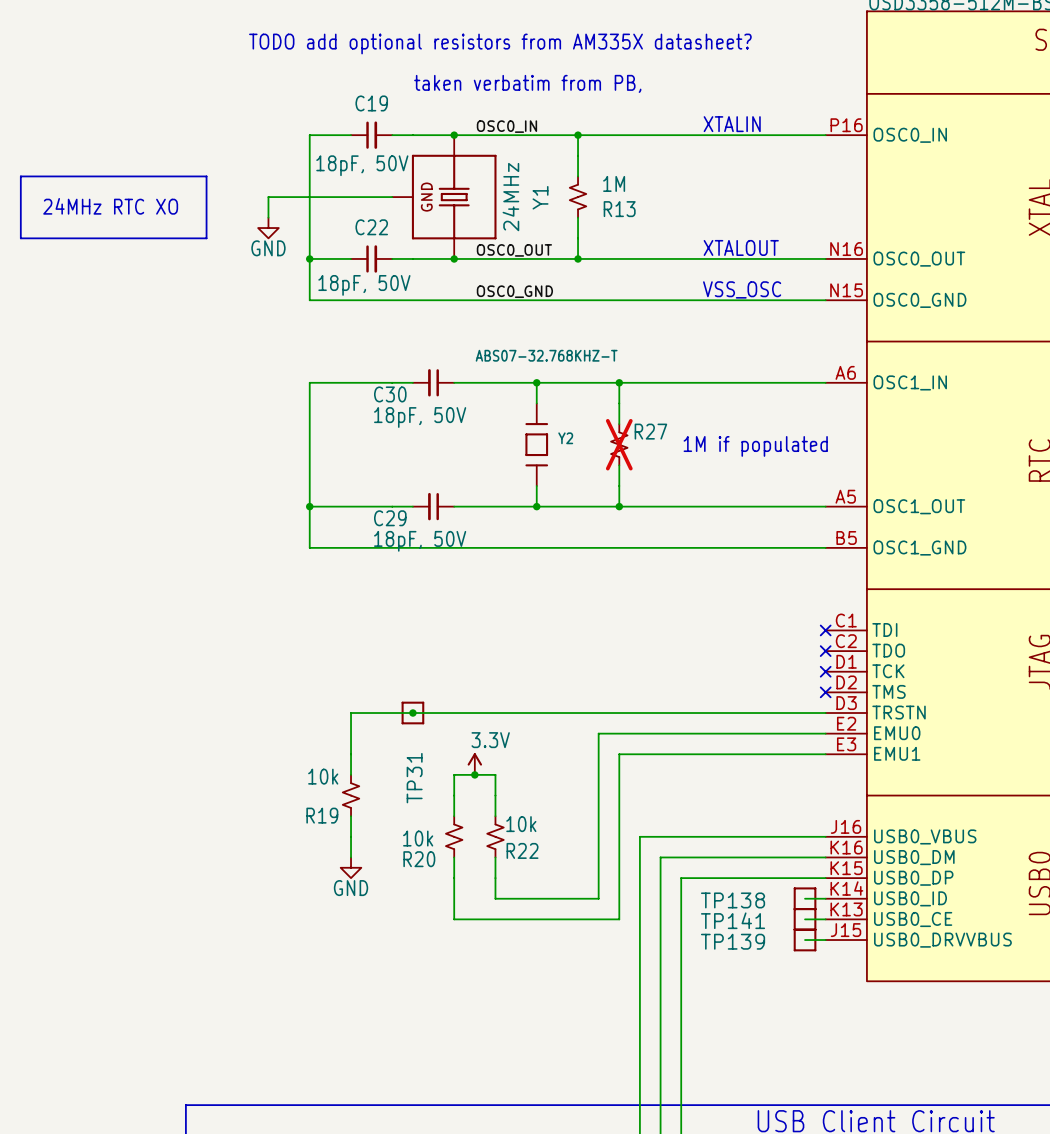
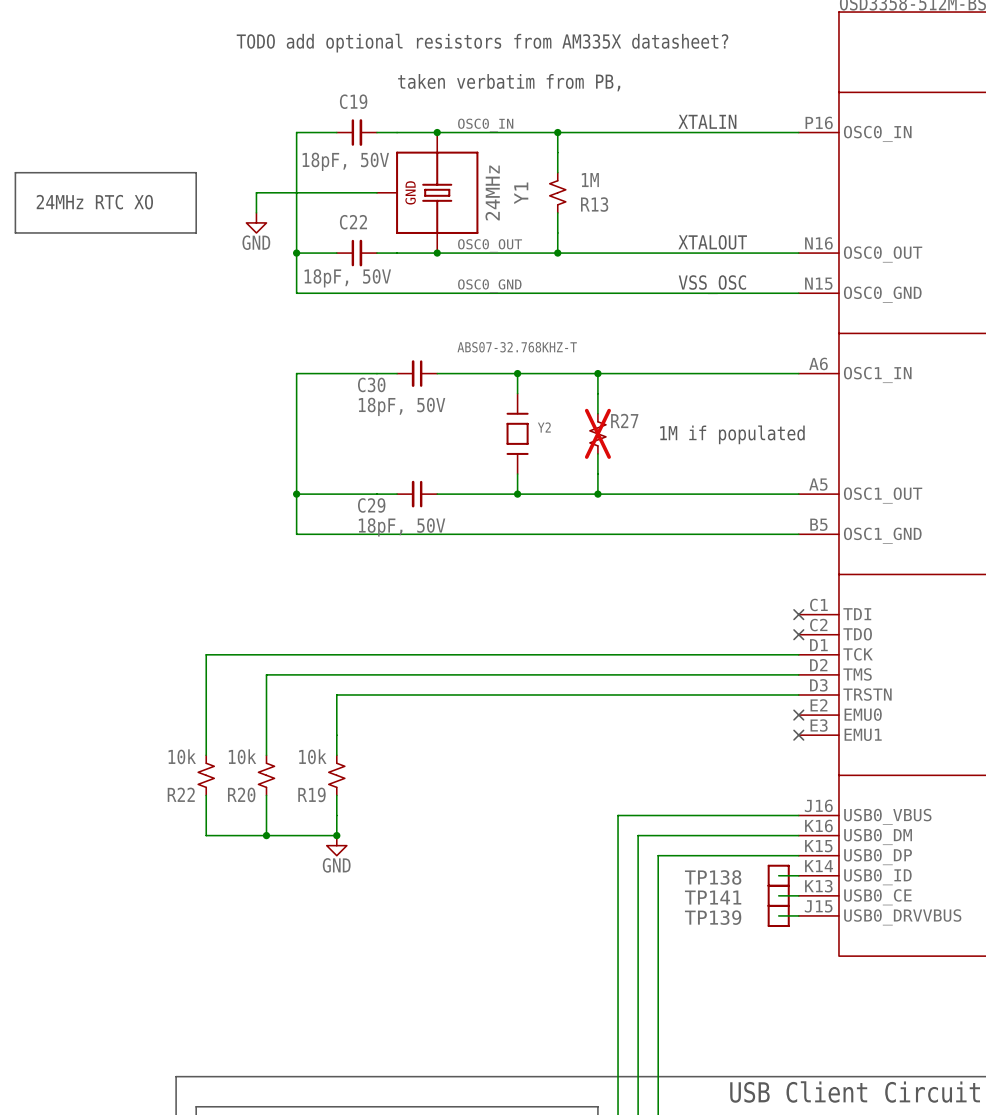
wire: none -> (798, 654) (206, 654) (206, 755)
no-connect mark: (825, 671) -> none
wire: none -> (798, 674) (266, 674) (266, 755)
no-connect mark: (825, 692) -> none
junction: (412, 713) -> none
TP31: (412, 713) -> none
wire: (825, 733) (598, 733) (598, 898) (495, 898) (495, 857) -> none
no-connect mark: none -> (798, 715)
wire: (825, 754) (619, 754) (619, 919) (454, 919) (454, 857) -> none
no-connect mark: none -> (798, 735)
power symbol: 3.3V (474, 764) -> none
junction: (474, 774) -> none
wire: none -> (206, 795) (206, 835) (336, 835)
wire: none -> (266, 795) (266, 835)
wire: (454, 816) (454, 774) (495, 774) (495, 816) -> none
R22 value position: 10k (521, 824) -> 10k (182, 756)
R20 position: (454, 836) -> (266, 775)
R22 position: (495, 836) -> (206, 775)
R20 value position: 10k (418, 838) -> 10k (242, 756)
R22 name position: R22 (522, 850) -> R22 (181, 794)
junction: none -> (266, 835)
junction: none -> (336, 835)
R20 name position: R20 (419, 859) -> R20 (241, 794)

